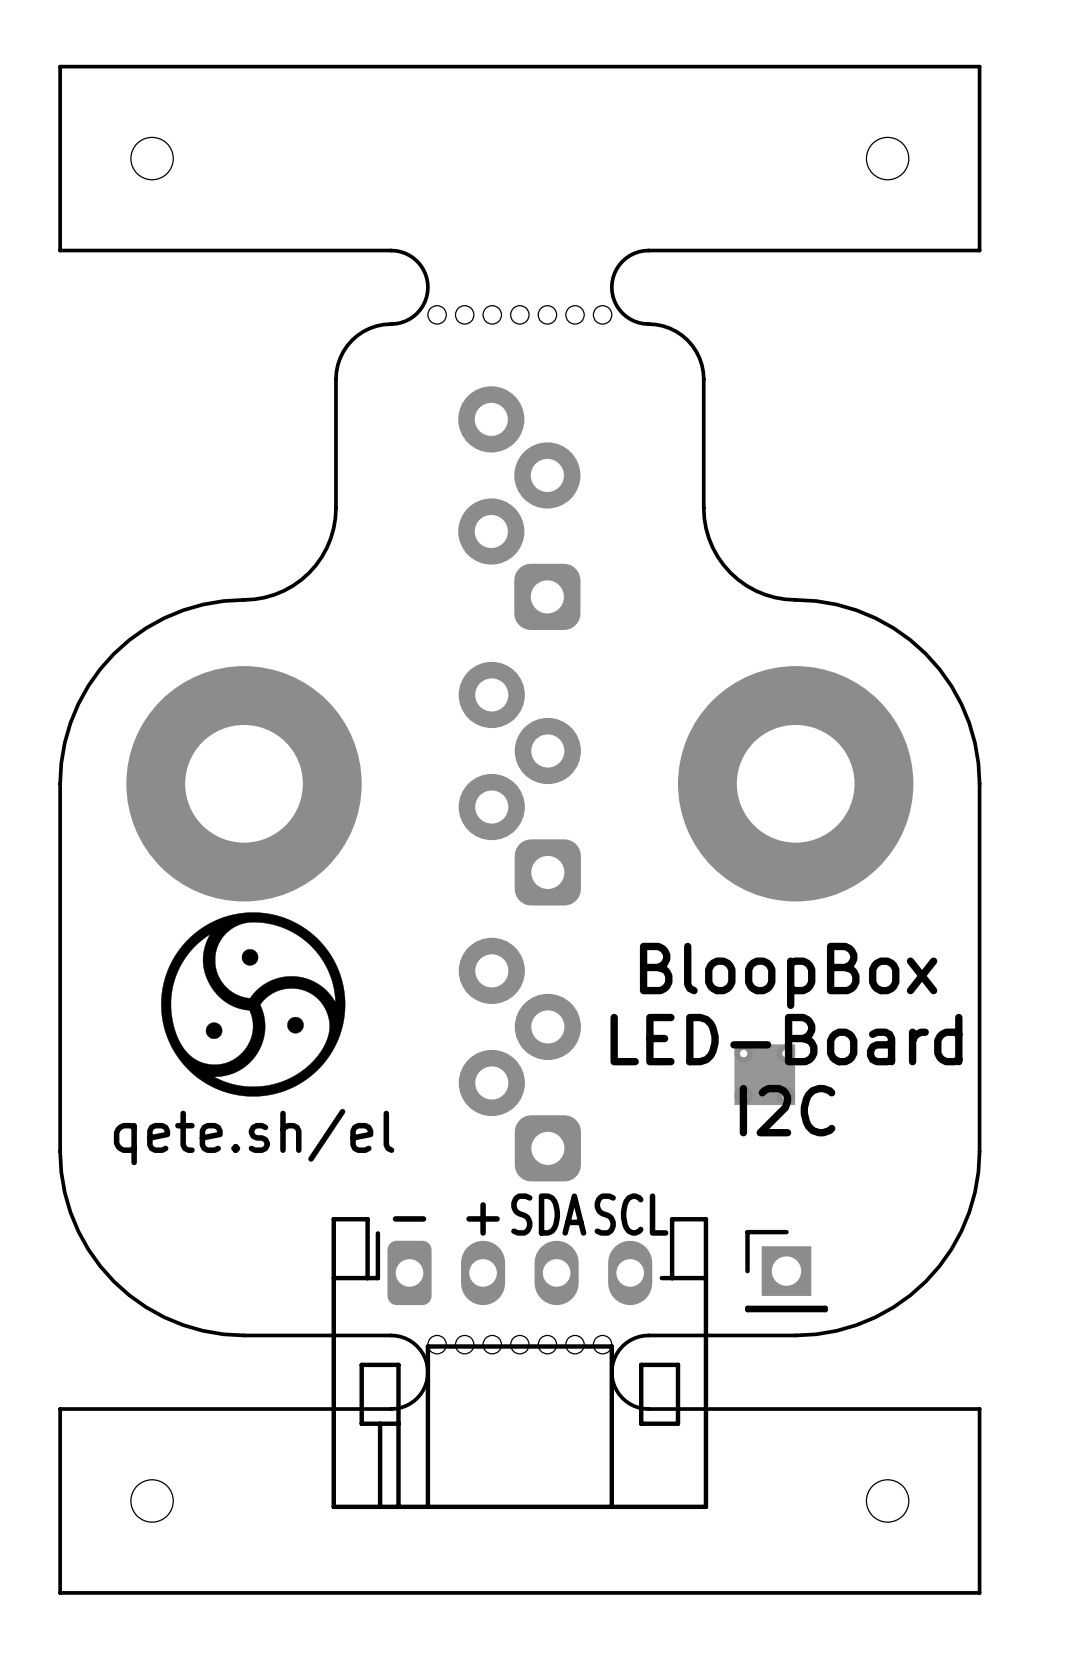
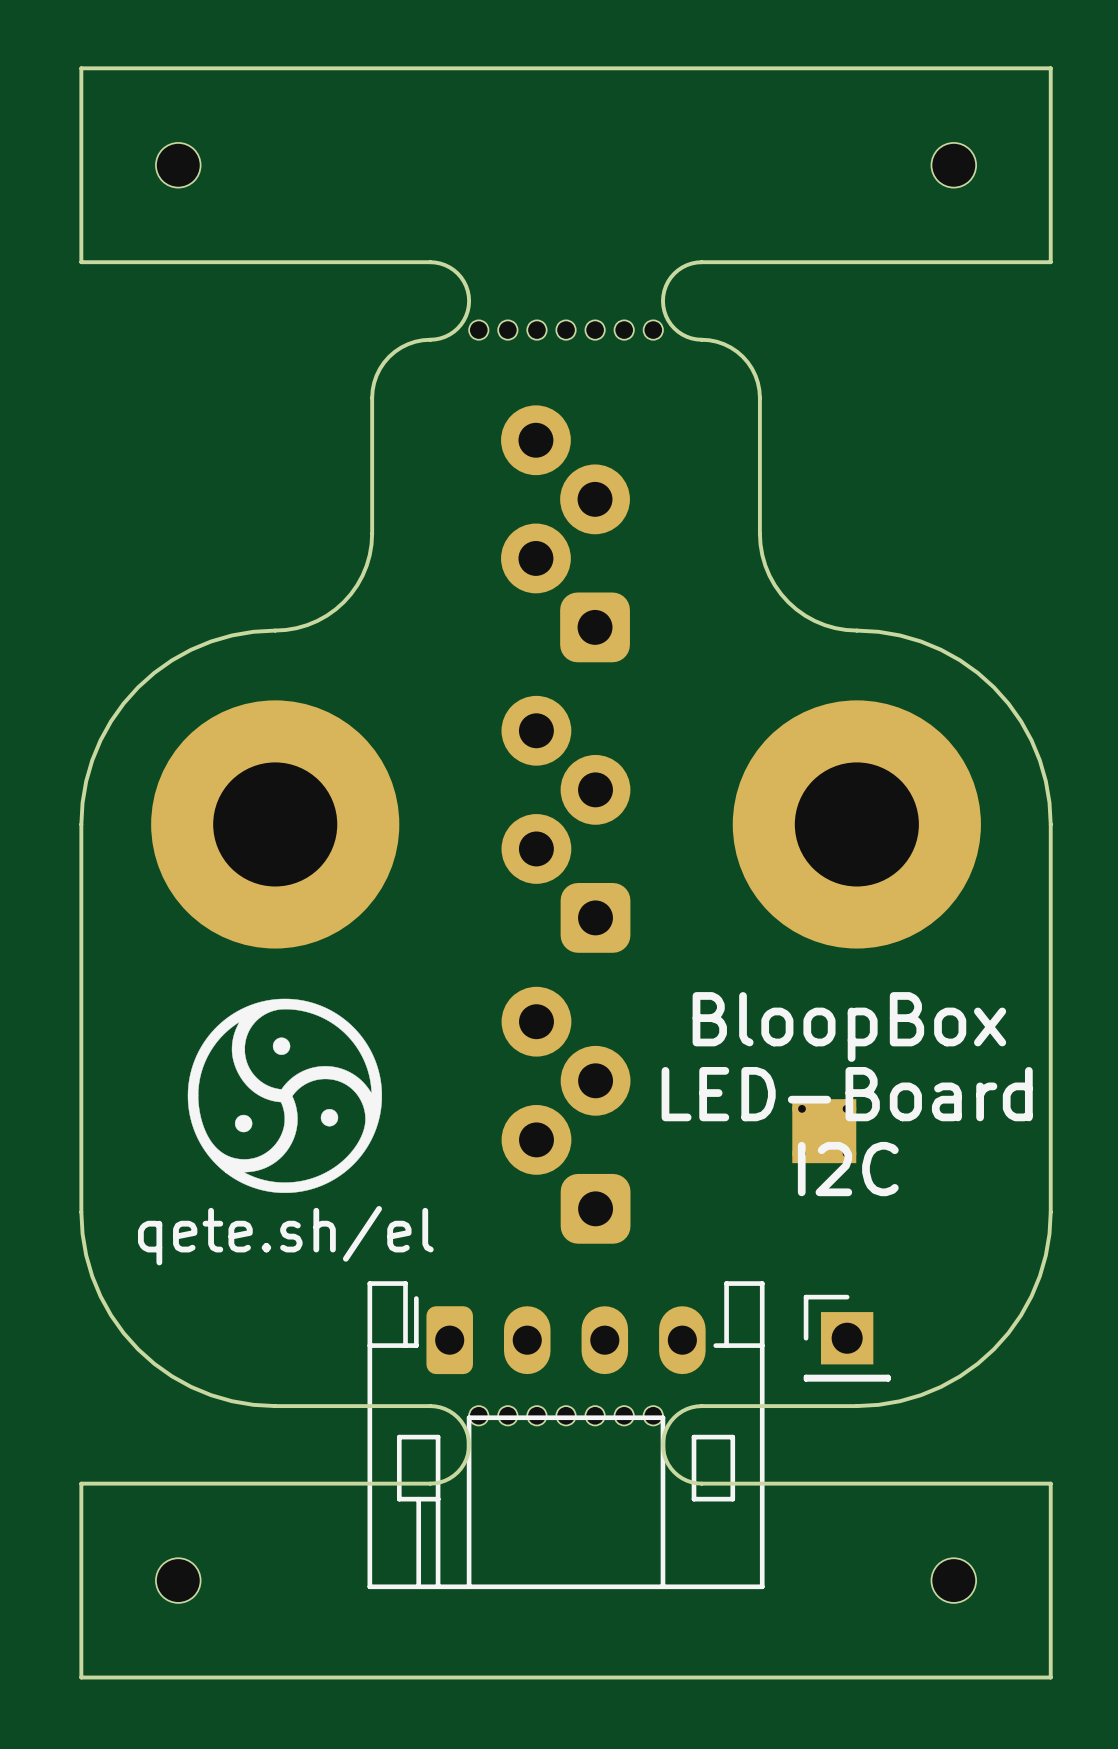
drawing position: (253, 1004) -> (284, 1095)
text position: qete.sh/el (254, 1137) -> qete.sh/el (285, 1235)
text: SDA (548, 1214) -> none
text: SCL (631, 1214) -> none
text: - (409, 1218) -> none
text: + (483, 1218) -> none

